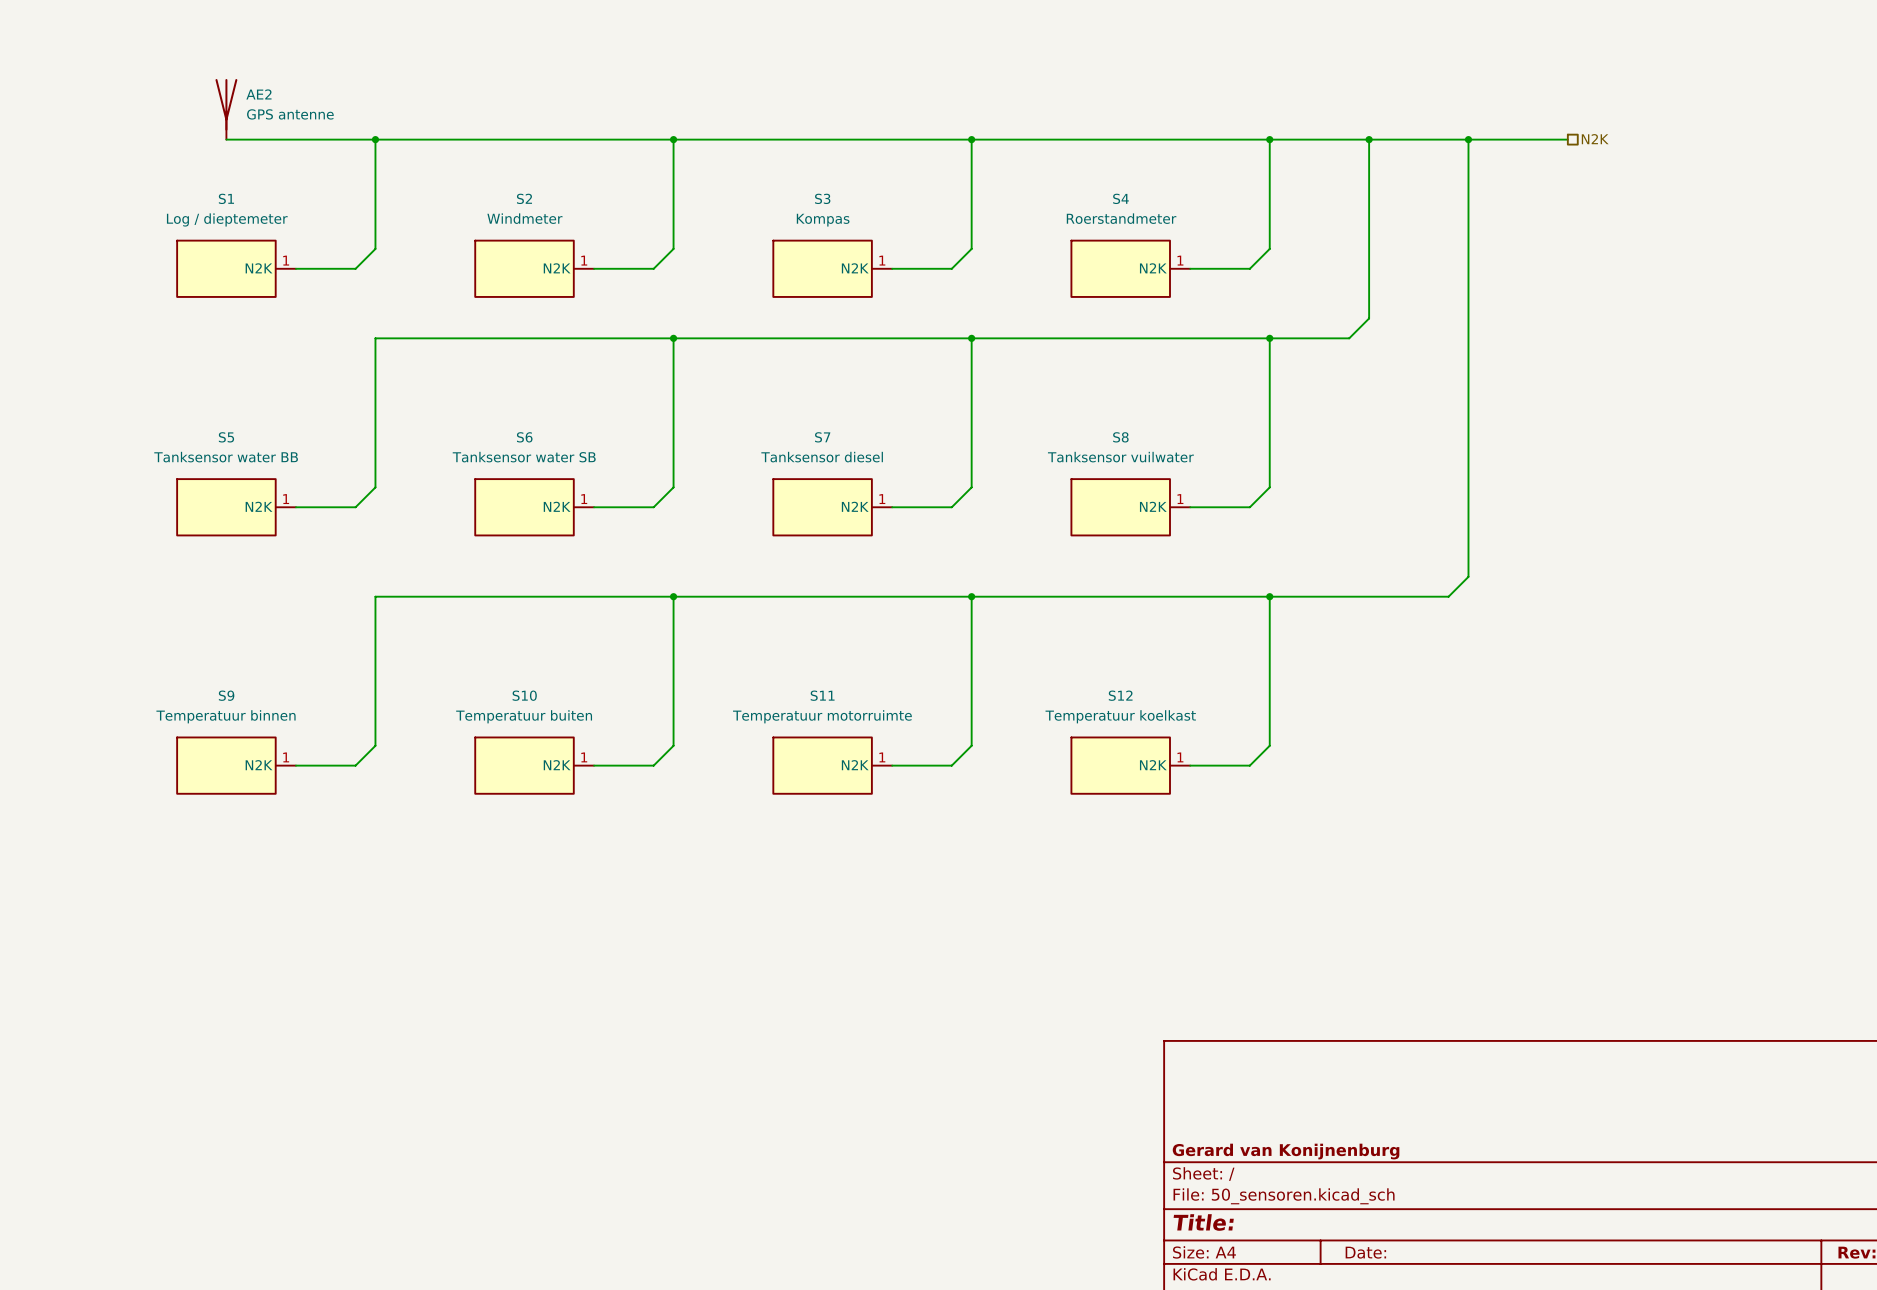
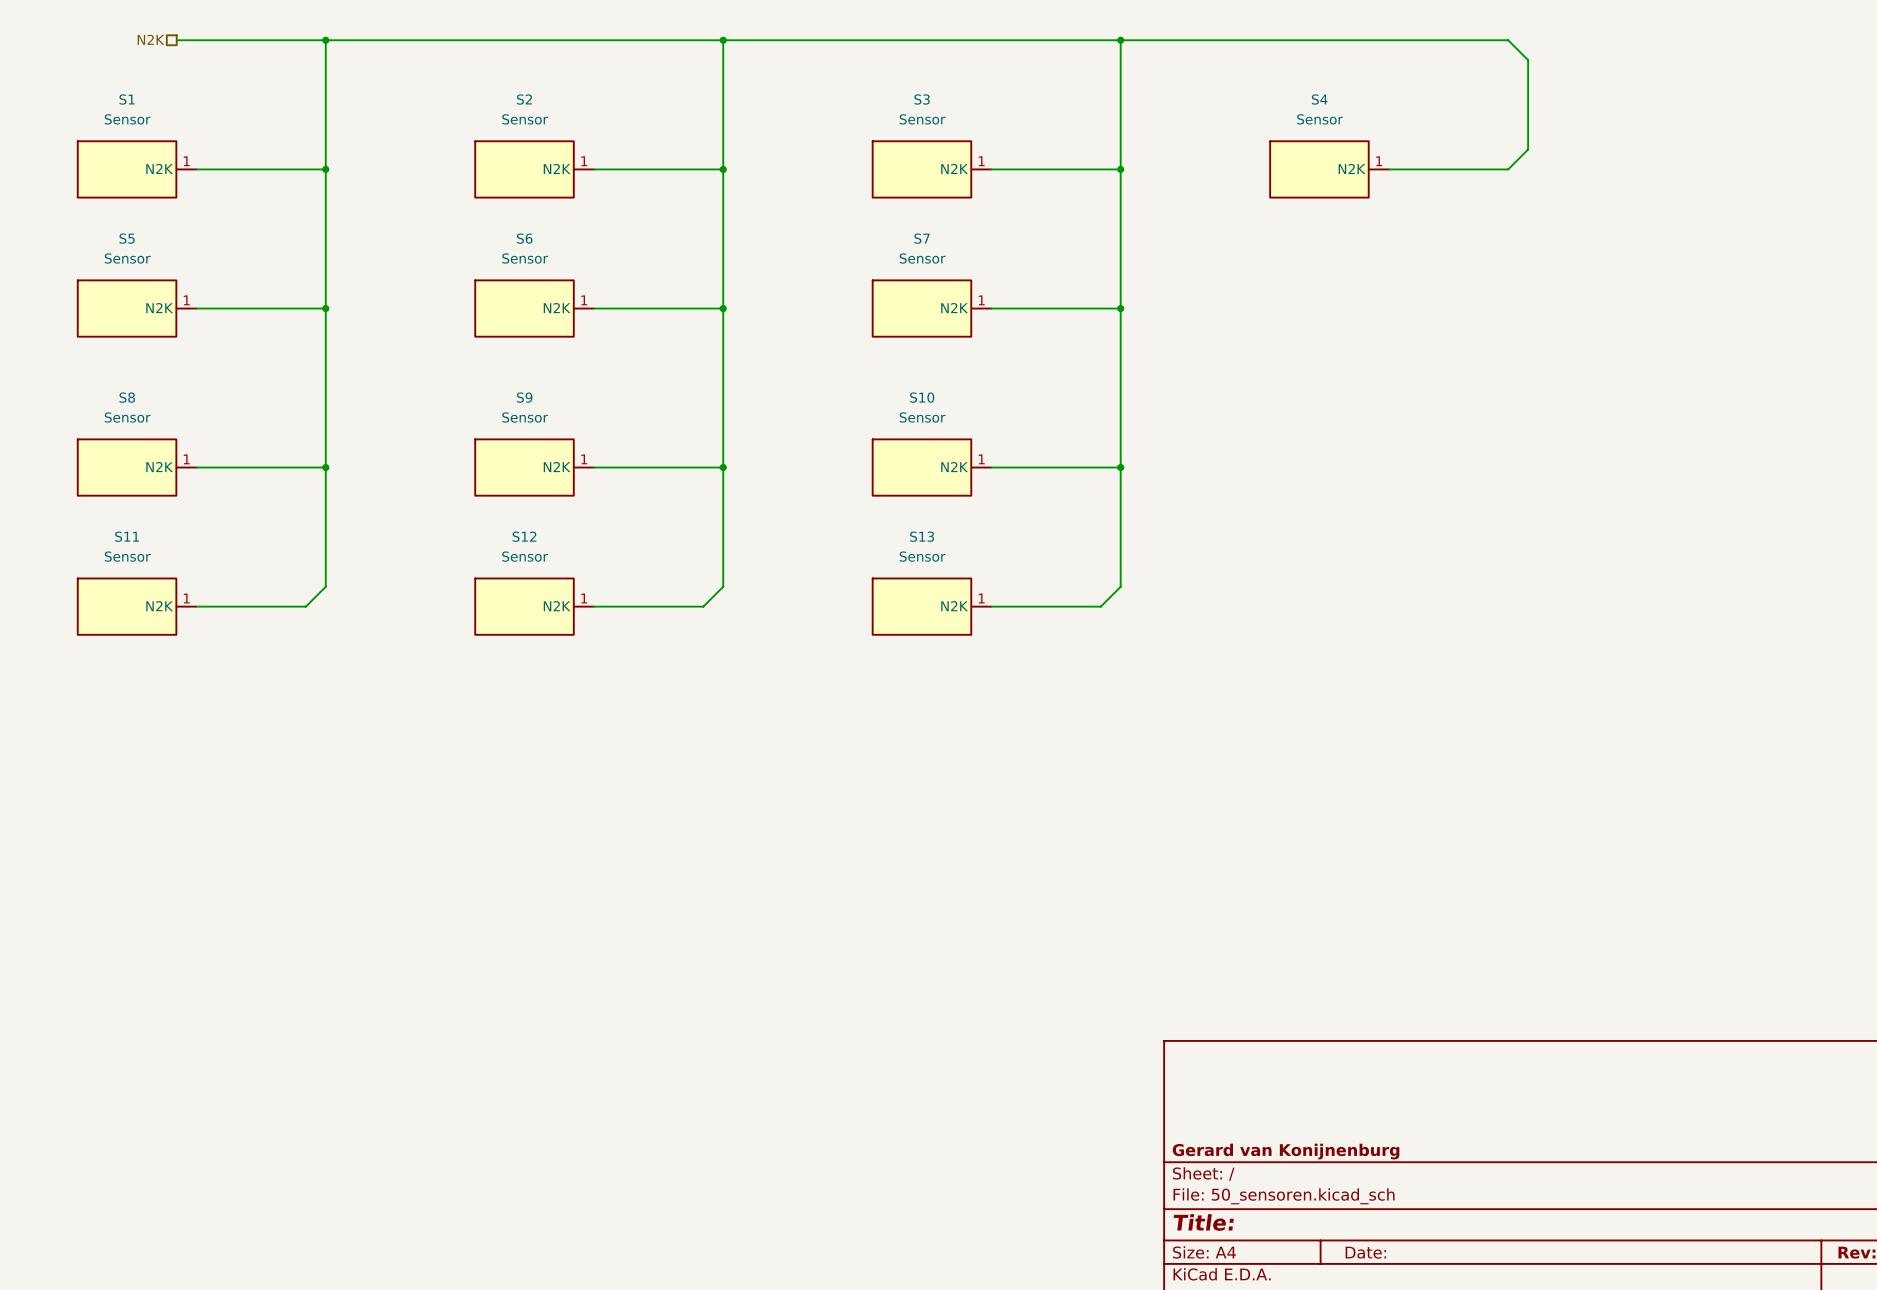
hierarchical label: none -> N2K (151, 39)
wire: none -> (176, 40) (1508, 40) (1528, 60) (1528, 149) (1508, 169) (1388, 169)
wire: none -> (325, 40) (325, 586) (305, 606) (196, 606)
junction: none -> (325, 40)
wire: none -> (723, 40) (723, 586) (703, 606) (594, 606)
junction: none -> (723, 40)
wire: none -> (1120, 40) (1120, 586) (1100, 606) (991, 606)
junction: none -> (1120, 40)
AE2: GPS antenne (226, 109) -> none
wire: (226, 139) (1567, 139) -> none
wire: (375, 139) (375, 248) (355, 268) (295, 268) -> none
junction: (375, 139) -> none
wire: (673, 139) (673, 248) (653, 268) (594, 268) -> none
junction: (673, 139) -> none
wire: (971, 139) (971, 248) (951, 268) (892, 268) -> none
junction: (971, 139) -> none
wire: (1269, 139) (1269, 248) (1249, 268) (1190, 268) -> none
junction: (1269, 139) -> none
wire: (1369, 139) (1369, 318) (1349, 338) (375, 338) (375, 487) (355, 507) (295, 507) -> none
junction: (1369, 139) -> none
wire: (1468, 139) (1468, 576) (1448, 596) (375, 596) (375, 745) (355, 765) (295, 765) -> none
junction: (1468, 139) -> none
hierarchical label: N2K (1595, 139) -> none
wire: none -> (196, 169) (325, 169)
junction: none -> (325, 169)
wire: none -> (594, 169) (723, 169)
junction: none -> (723, 169)
wire: none -> (991, 169) (1120, 169)
junction: none -> (1120, 169)
S2 value: Windmeter (524, 218) -> Sensor (525, 119)
S4 value: Roerstandmeter (1121, 218) -> Sensor (1320, 119)
S1 value: Log / dieptemeter (227, 219) -> Sensor (127, 119)
S3 value: Kompas (823, 220) -> Sensor (922, 119)
S1 position: (236, 268) -> (137, 169)
S2 position: (534, 268) -> (534, 169)
S3 position: (832, 268) -> (932, 169)
S4 position: (1130, 268) -> (1329, 169)
wire: none -> (196, 308) (325, 308)
junction: none -> (325, 308)
wire: none -> (594, 308) (723, 308)
junction: none -> (723, 308)
wire: none -> (991, 308) (1120, 308)
junction: none -> (1120, 308)
wire: (673, 338) (673, 487) (653, 507) (594, 507) -> none
junction: (673, 338) -> none
wire: (971, 338) (971, 487) (951, 507) (892, 507) -> none
junction: (971, 338) -> none
wire: (1269, 338) (1269, 487) (1249, 507) (1190, 507) -> none
junction: (1269, 338) -> none
S5 value: Tanksensor water BB (226, 457) -> Sensor (127, 258)
S6 value: Tanksensor water SB (524, 457) -> Sensor (525, 258)
S7 value: Tanksensor diesel (822, 457) -> Sensor (922, 258)
S8 value: Tanksensor vuilwater (1120, 457) -> Sensor (127, 417)
wire: none -> (196, 467) (325, 467)
junction: none -> (325, 467)
wire: none -> (594, 467) (723, 467)
junction: none -> (723, 467)
wire: none -> (991, 467) (1120, 467)
junction: none -> (1120, 467)
S5 position: (236, 507) -> (137, 308)
S6 position: (534, 507) -> (534, 308)
S7 position: (832, 507) -> (932, 308)
S8 position: (1130, 507) -> (137, 467)
wire: (673, 596) (673, 745) (653, 765) (594, 765) -> none
junction: (673, 596) -> none
wire: (971, 596) (971, 745) (951, 765) (892, 765) -> none
junction: (971, 596) -> none
wire: (1269, 596) (1269, 745) (1249, 765) (1190, 765) -> none
junction: (1269, 596) -> none
S13: none -> Sensor (932, 606)
S9 value: Temperatuur binnen (226, 716) -> Sensor (525, 417)
S10 value: Temperatuur buiten (524, 716) -> Sensor (922, 417)
S11 value: Temperatuur motorruimte (822, 716) -> Sensor (127, 556)
S12 value: Temperatuur koelkast (1120, 716) -> Sensor (525, 556)
S9 position: (236, 765) -> (534, 467)
S10 position: (534, 765) -> (932, 467)
S11 position: (832, 765) -> (137, 606)
S12 position: (1130, 765) -> (534, 606)

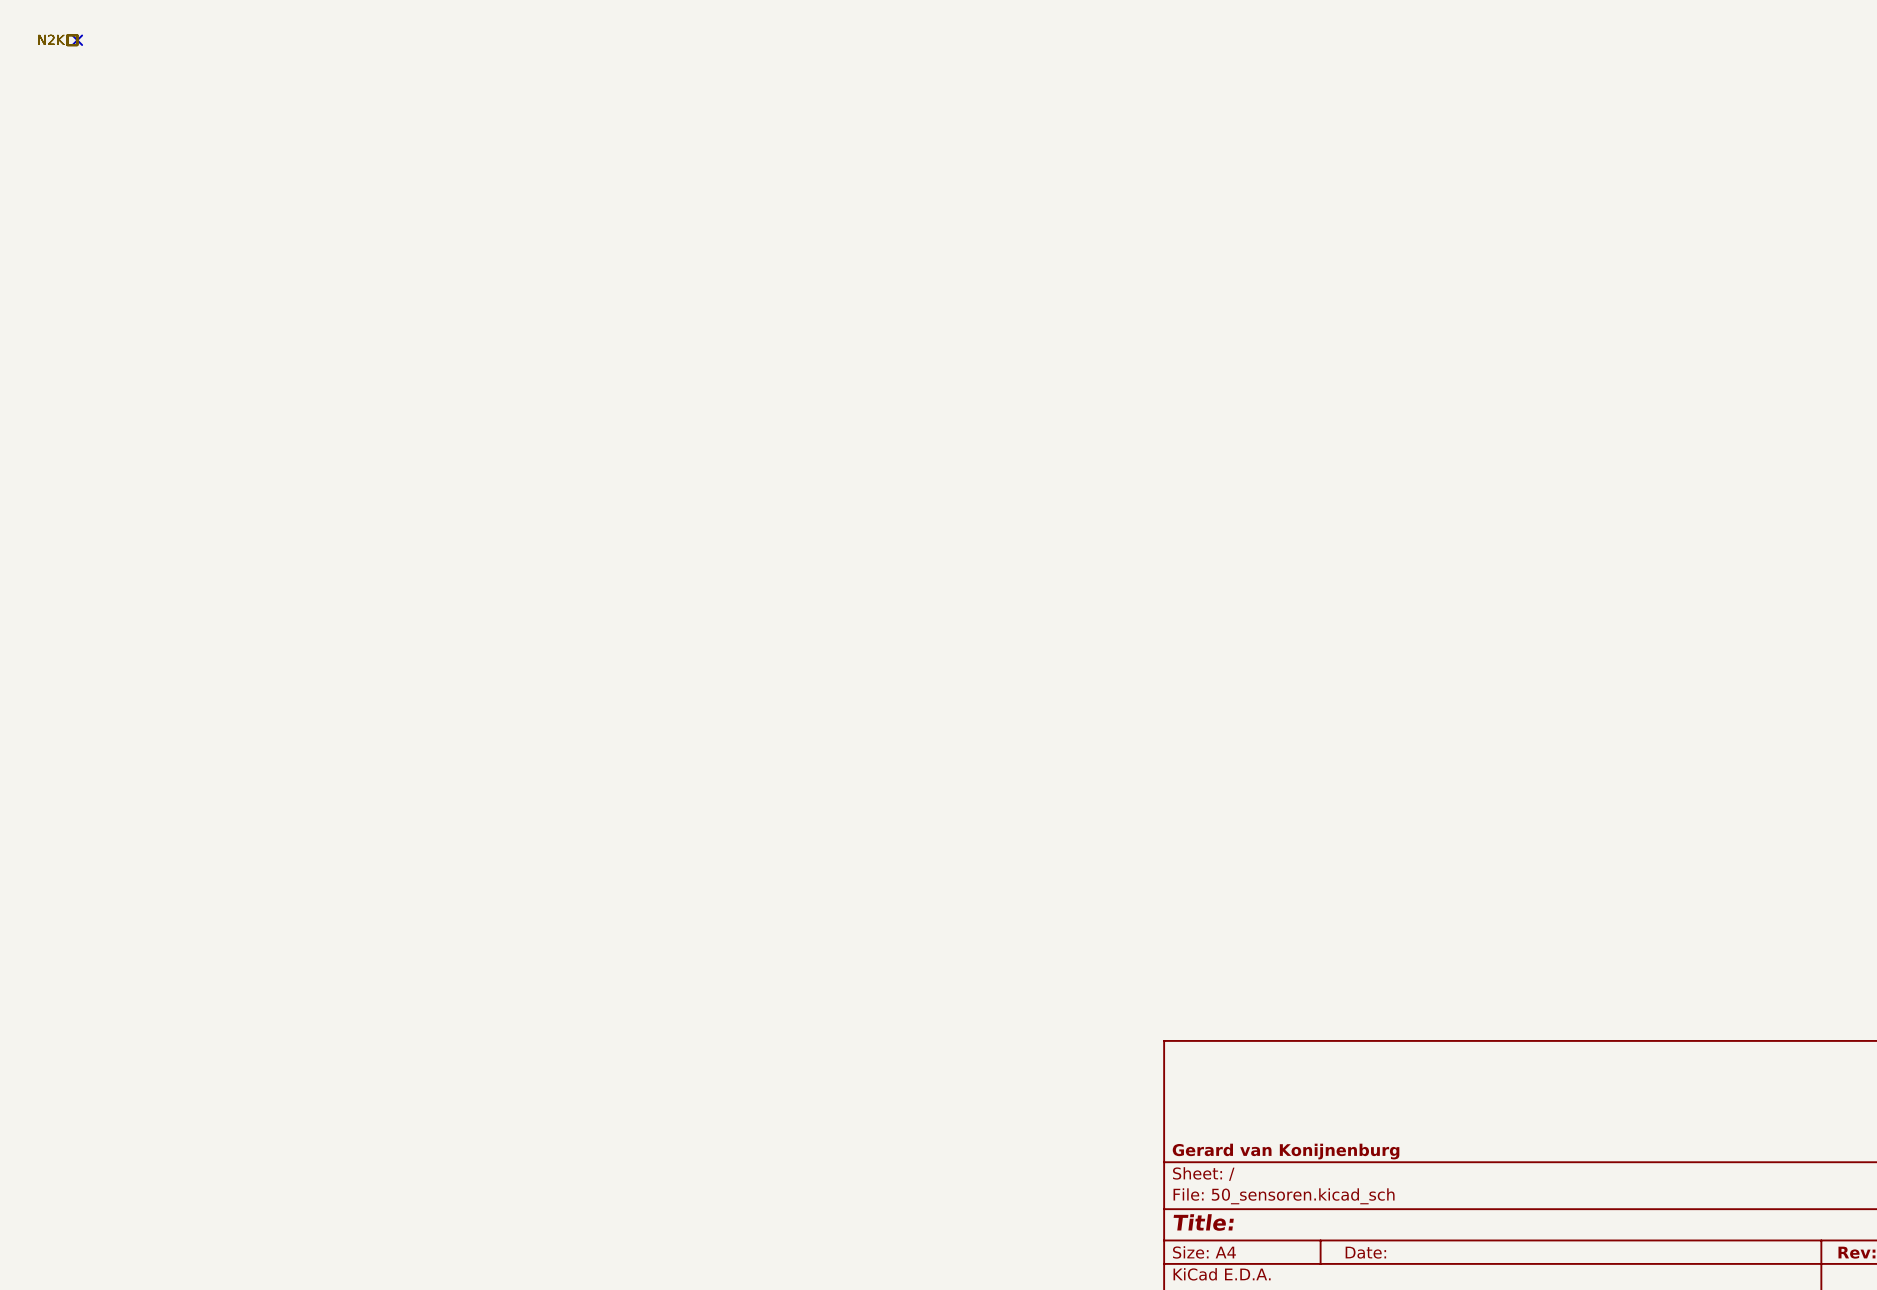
hierarchical label position: N2K (151, 39) -> N2K (51, 39)
no-connect mark: none -> (77, 40)
wire: (176, 40) (1508, 40) (1528, 60) (1528, 149) (1508, 169) (1388, 169) -> none
wire: (325, 40) (325, 586) (305, 606) (196, 606) -> none
junction: (325, 40) -> none
wire: (723, 40) (723, 586) (703, 606) (594, 606) -> none
junction: (723, 40) -> none
wire: (1120, 40) (1120, 586) (1100, 606) (991, 606) -> none
junction: (1120, 40) -> none
S1: Sensor (137, 169) -> none
wire: (196, 169) (325, 169) -> none
junction: (325, 169) -> none
S2: Sensor (534, 169) -> none
wire: (594, 169) (723, 169) -> none
junction: (723, 169) -> none
S3: Sensor (932, 169) -> none
wire: (991, 169) (1120, 169) -> none
junction: (1120, 169) -> none
S4: Sensor (1329, 169) -> none
S5: Sensor (137, 308) -> none
wire: (196, 308) (325, 308) -> none
junction: (325, 308) -> none
S6: Sensor (534, 308) -> none
wire: (594, 308) (723, 308) -> none
junction: (723, 308) -> none
S7: Sensor (932, 308) -> none
wire: (991, 308) (1120, 308) -> none
junction: (1120, 308) -> none
S8: Sensor (137, 467) -> none
wire: (196, 467) (325, 467) -> none
junction: (325, 467) -> none
S9: Sensor (534, 467) -> none
wire: (594, 467) (723, 467) -> none
junction: (723, 467) -> none
S10: Sensor (932, 467) -> none
wire: (991, 467) (1120, 467) -> none
junction: (1120, 467) -> none
S11: Sensor (137, 606) -> none
S12: Sensor (534, 606) -> none
S13: Sensor (932, 606) -> none

